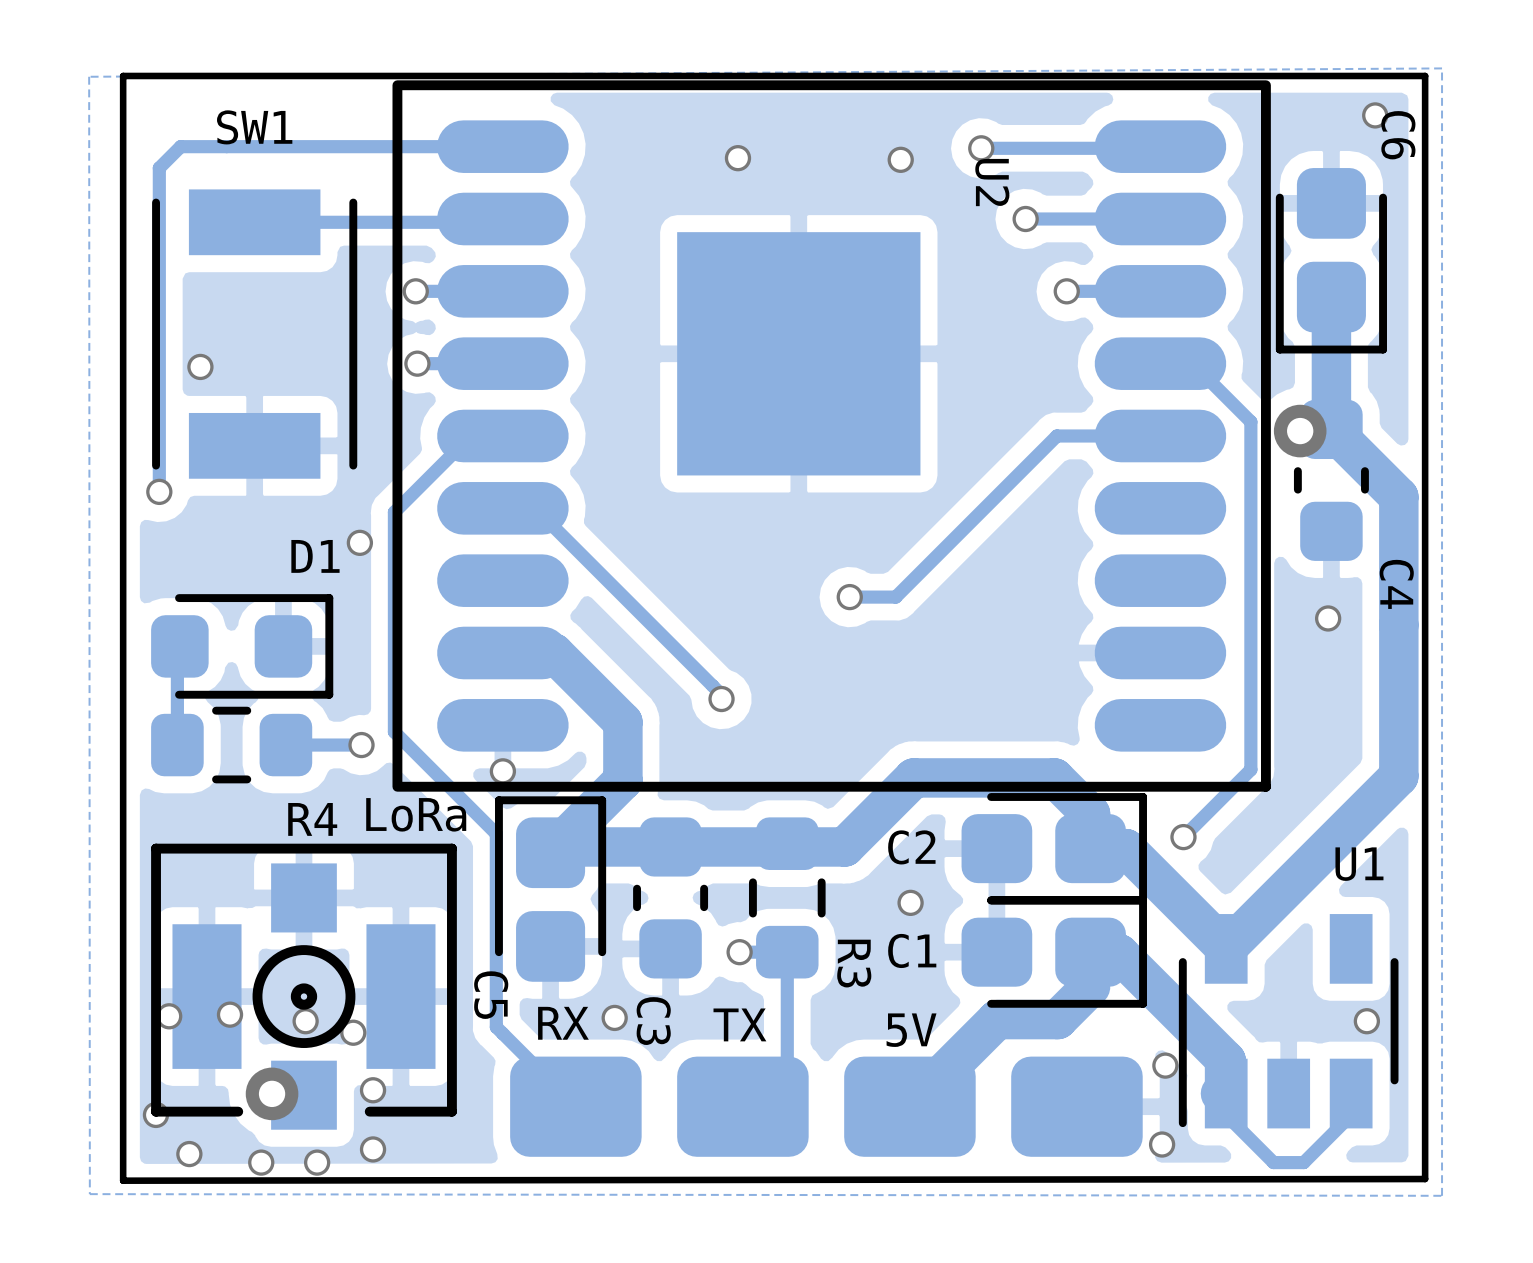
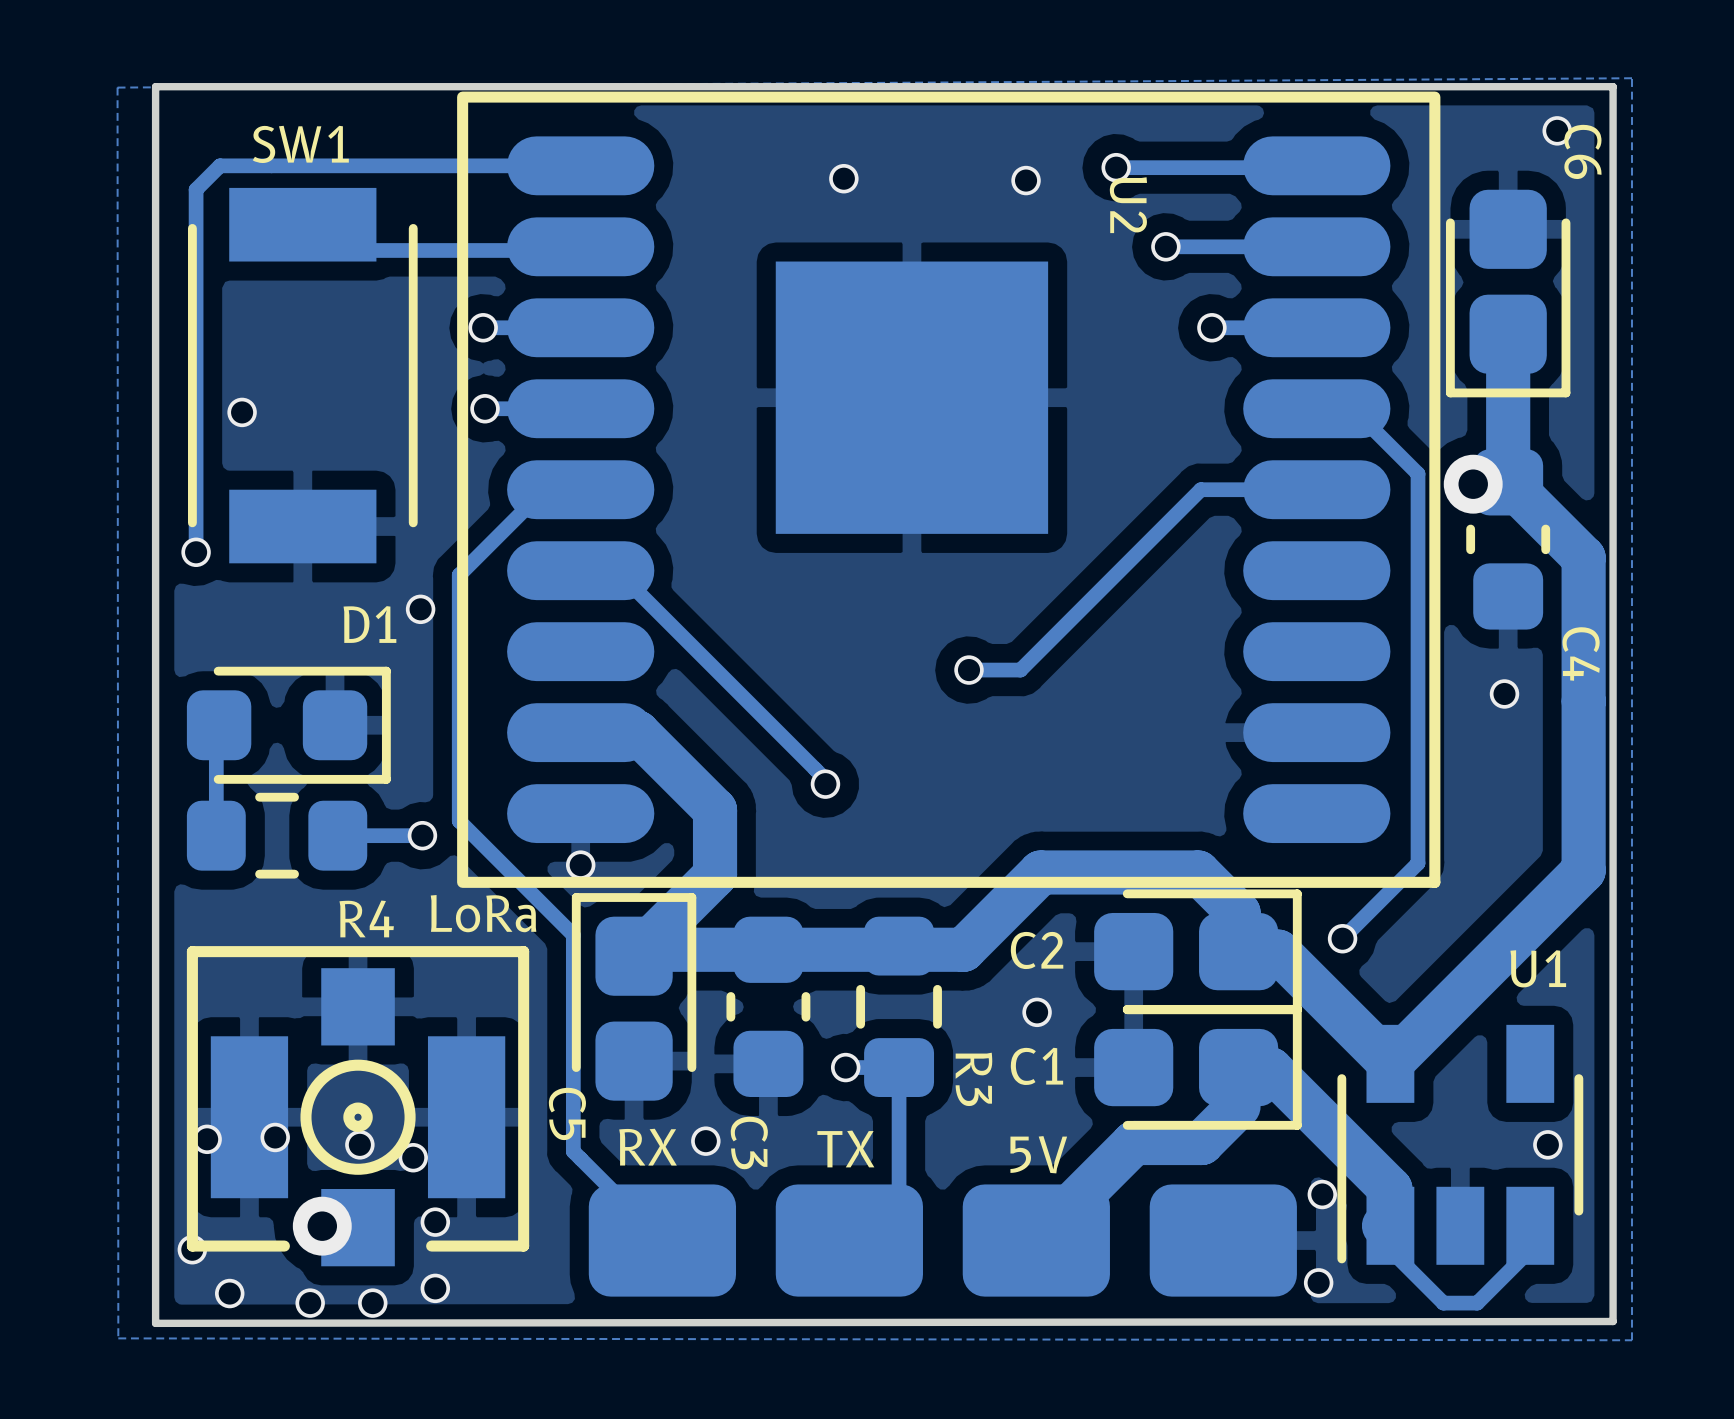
SW1 footprint: [152, 189, 358, 479] -> [187, 187, 418, 564]

